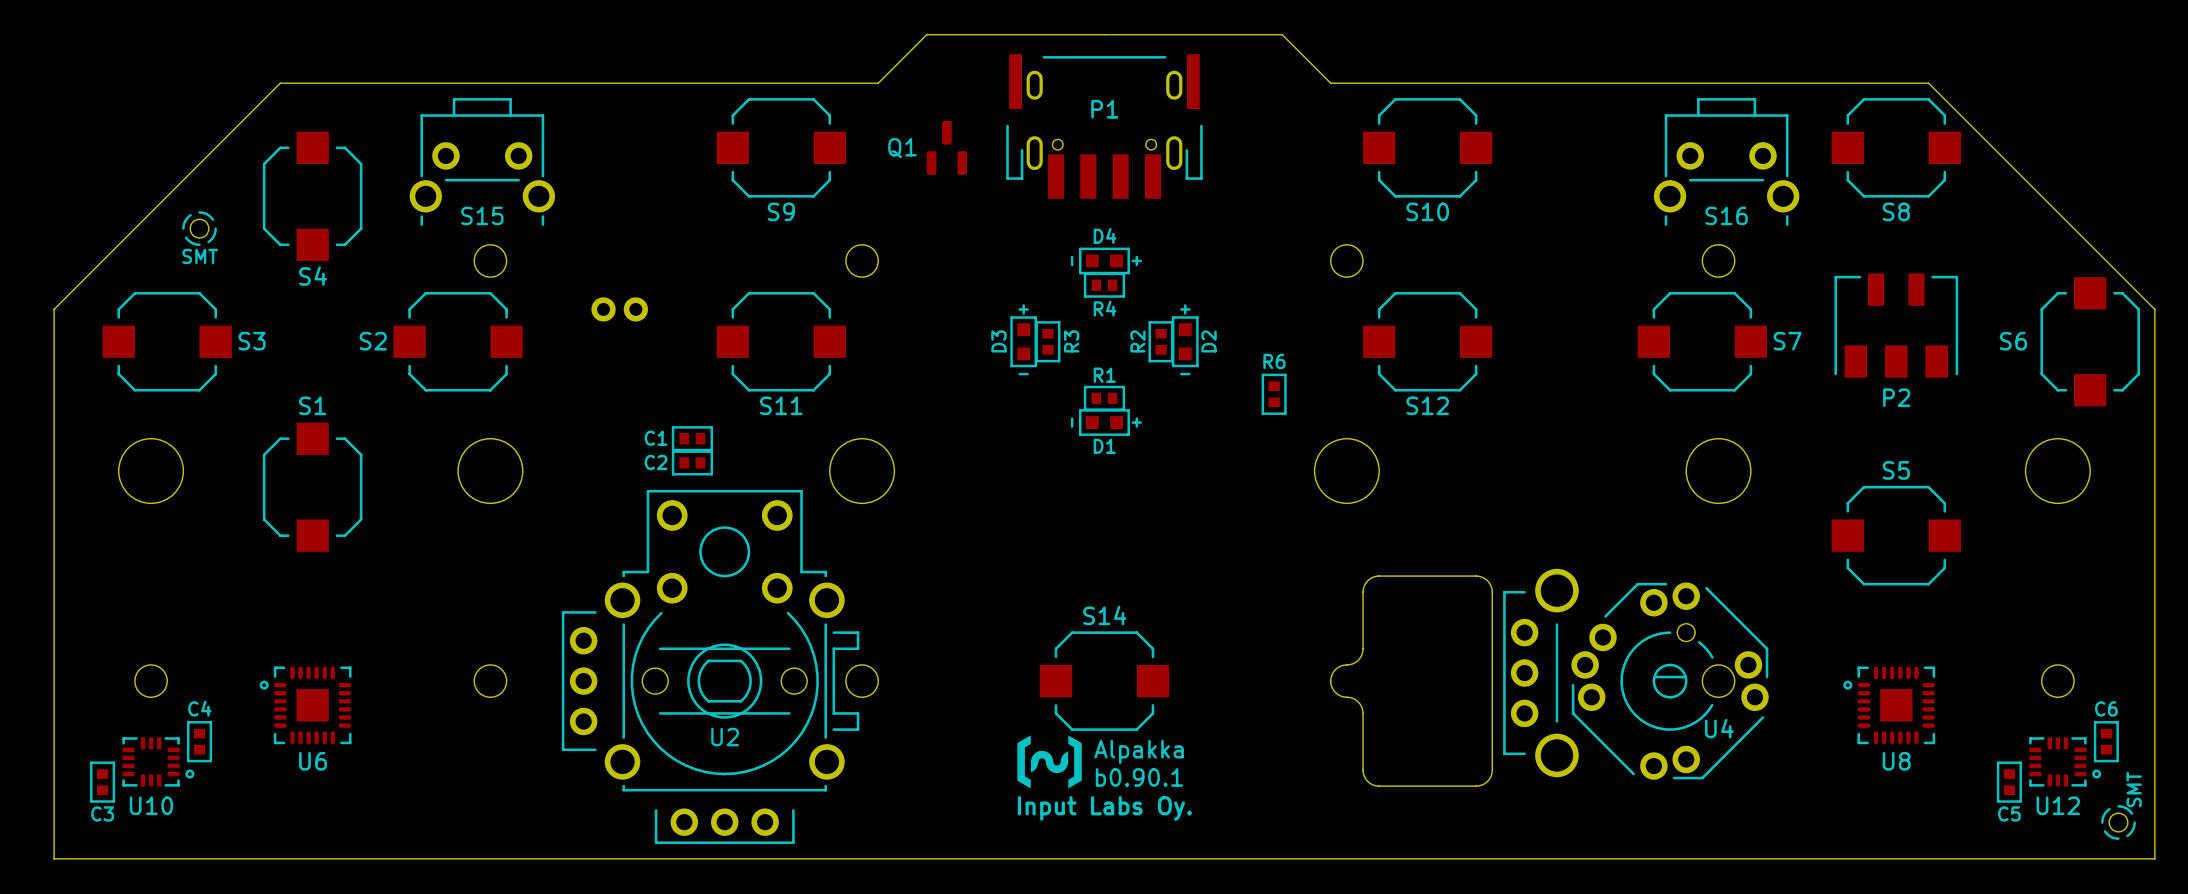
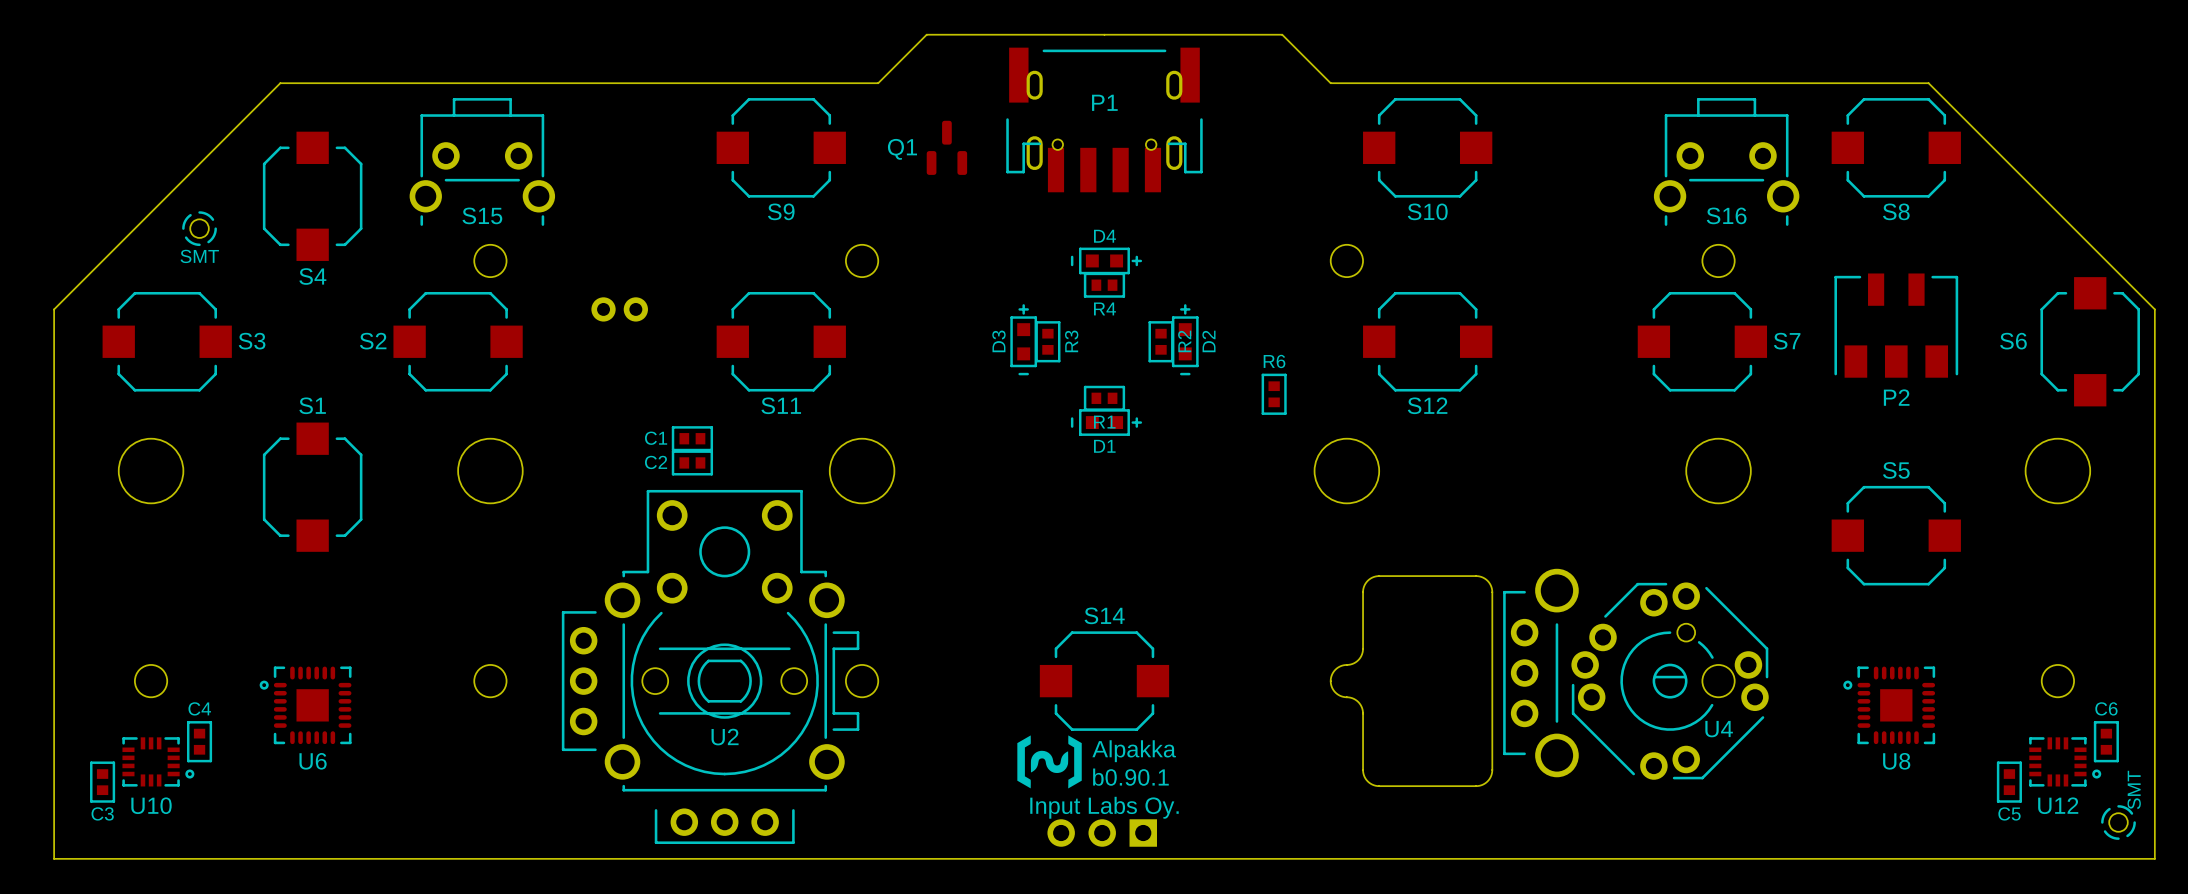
P1 footprint: [1006, 54, 1203, 199] -> [1006, 47, 1203, 193]
R2 name position: R2 (1137, 341) -> R2 (1184, 341)
R1 name position: R1 (1104, 375) -> R1 (1104, 422)
part: none -> (1102, 833)

